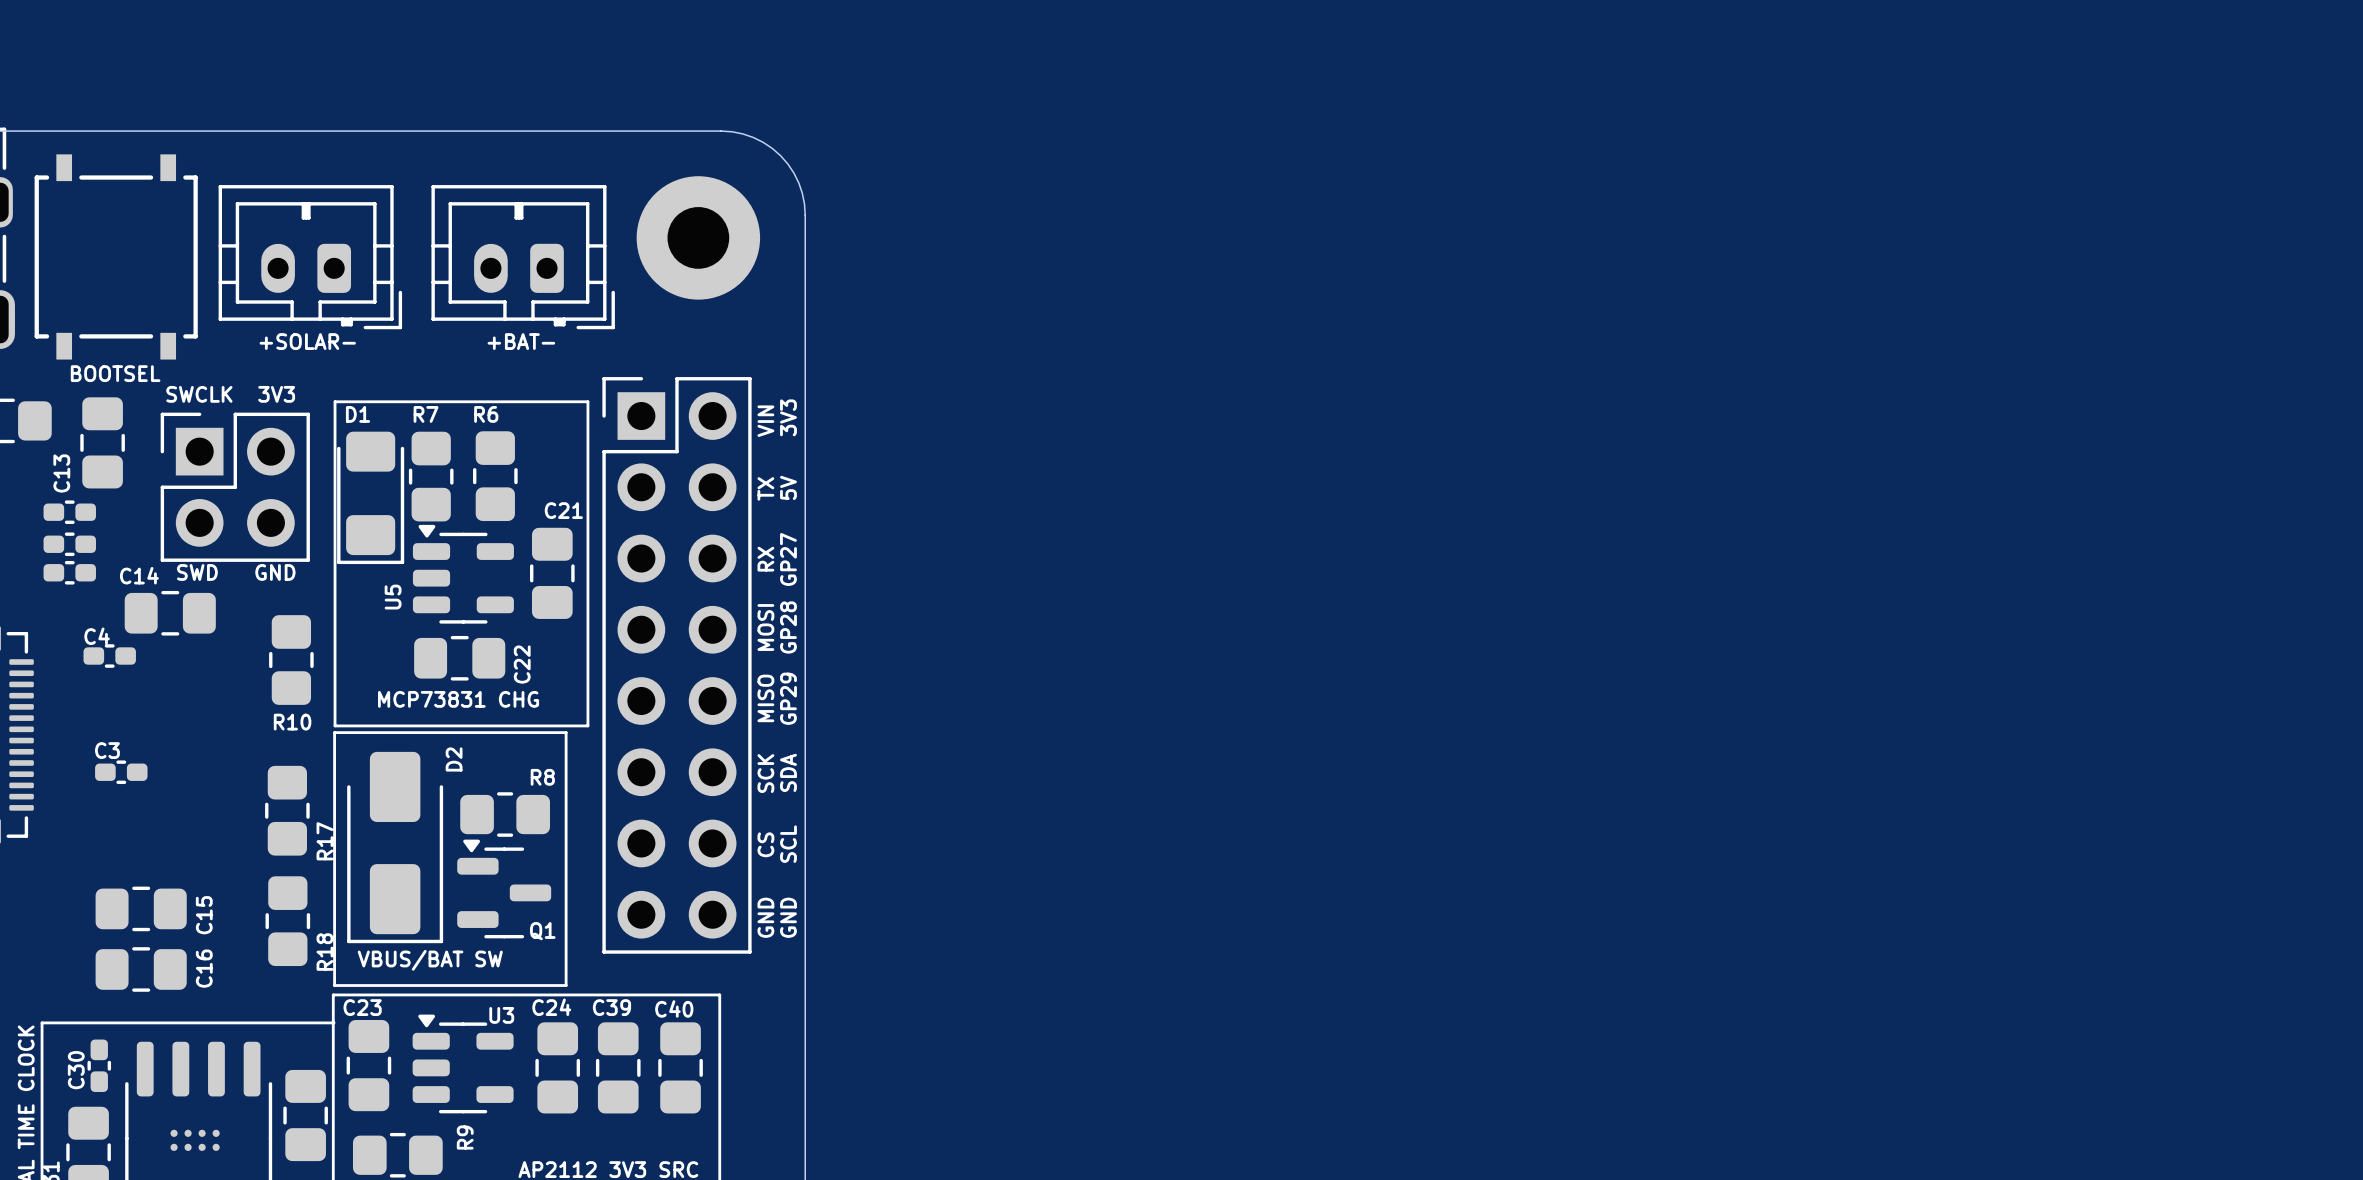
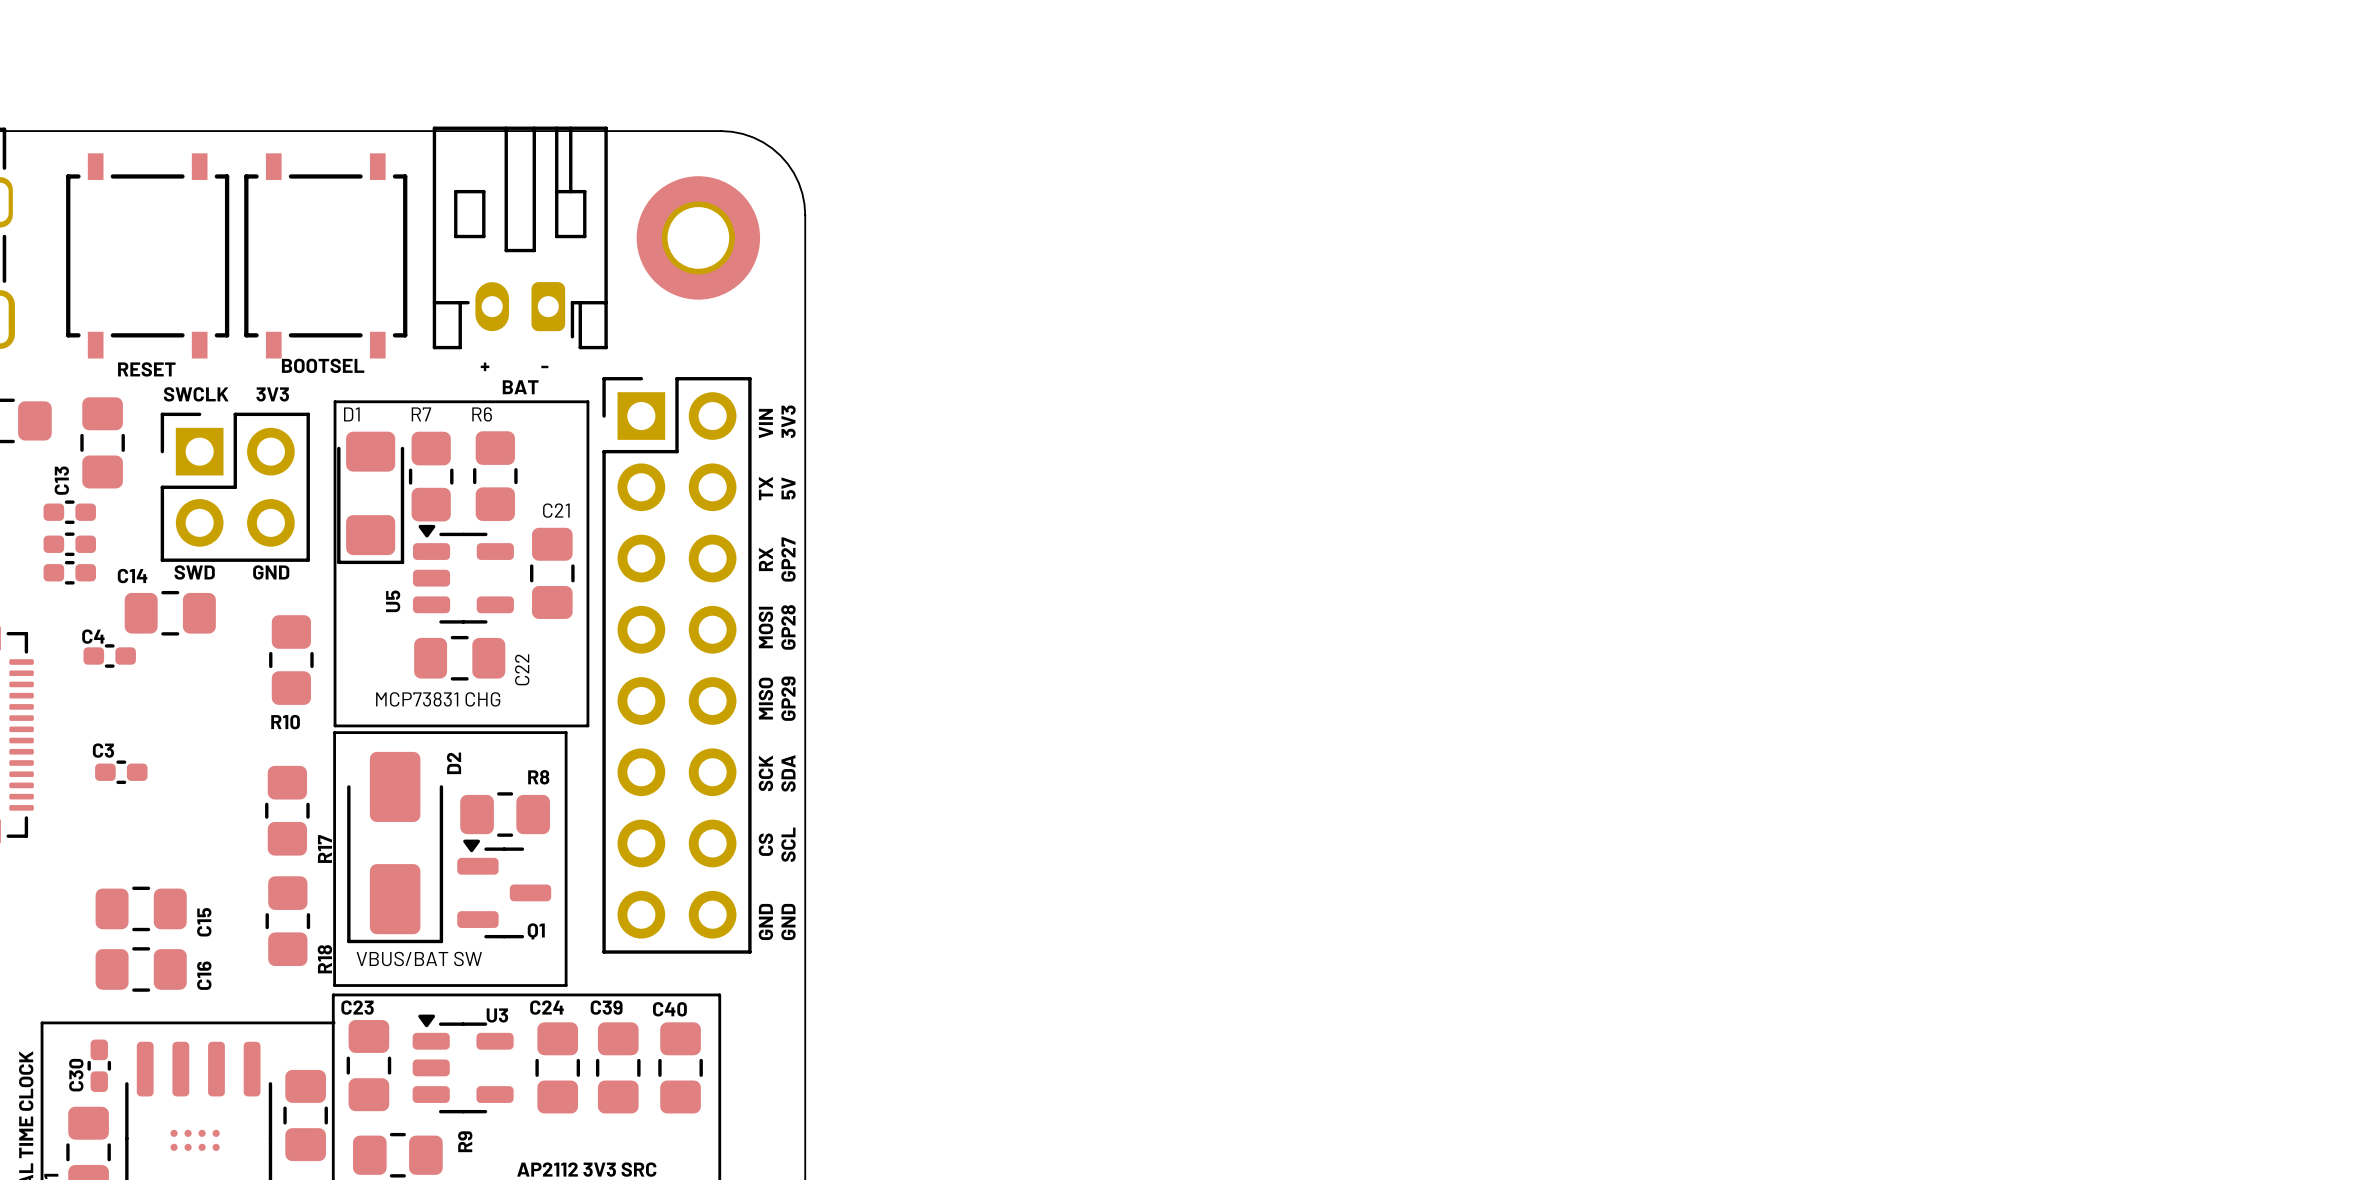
part footprint: [218, 185, 403, 330] -> [244, 153, 408, 359]
part footprint: [431, 185, 615, 330] -> [432, 126, 608, 350]
part position: (116, 256) -> (147, 255)
text: +SOLAR- (307, 341) -> none
text: +BAT- (521, 341) -> none
text: none -> + (485, 366)
text: none -> - (544, 366)
text: none -> RESET (146, 369)
text position: BOOTSEL (115, 373) -> BOOTSEL (323, 365)
text: none -> BAT (520, 387)

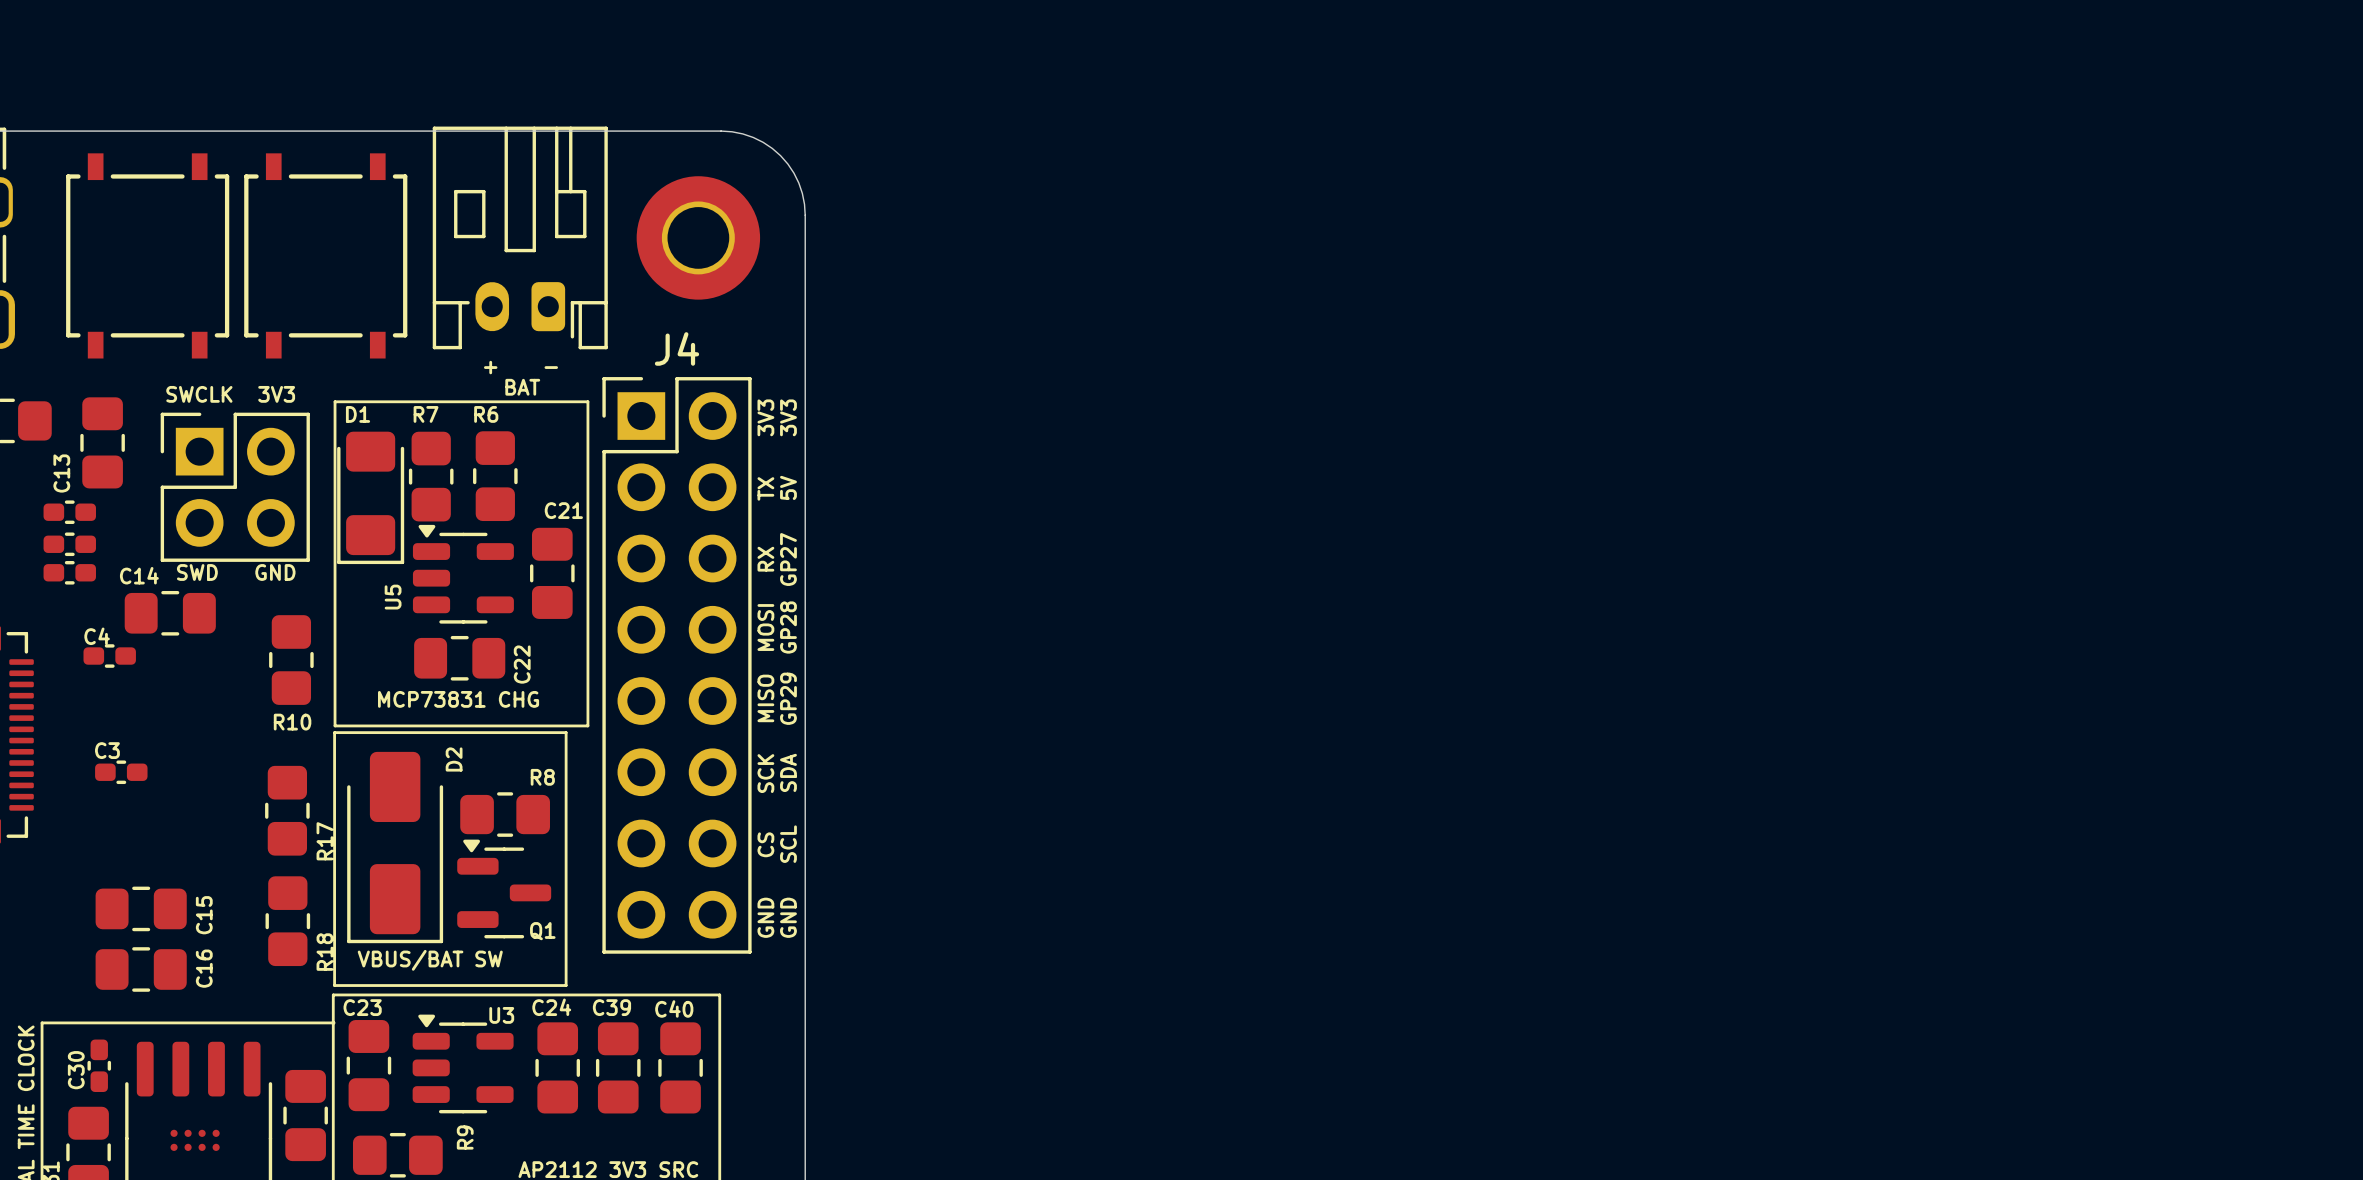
J4 name: none -> J4 (676, 348)
text: BOOTSEL (323, 365) -> none
text: RESET (146, 369) -> none
text: VIN (765, 423) -> 3V3 (765, 417)

